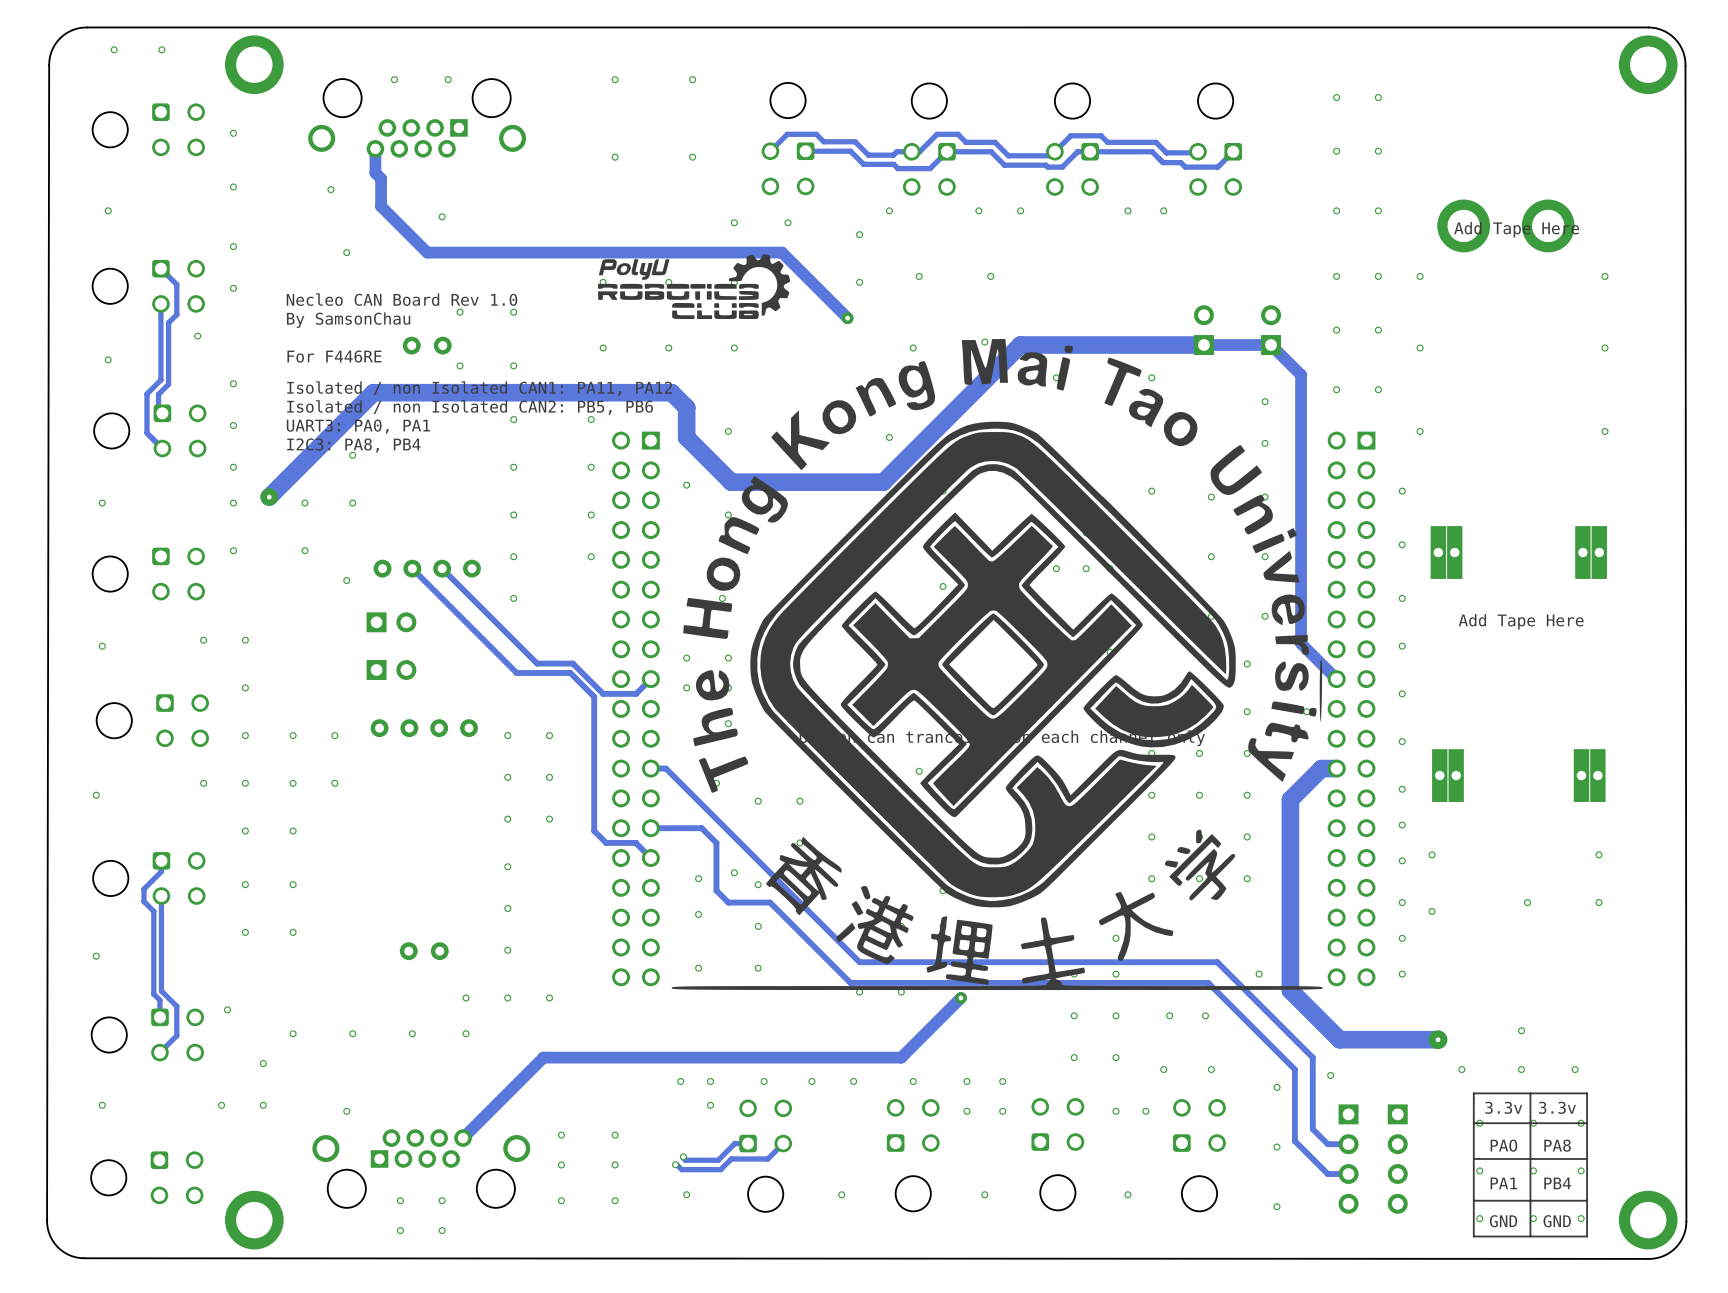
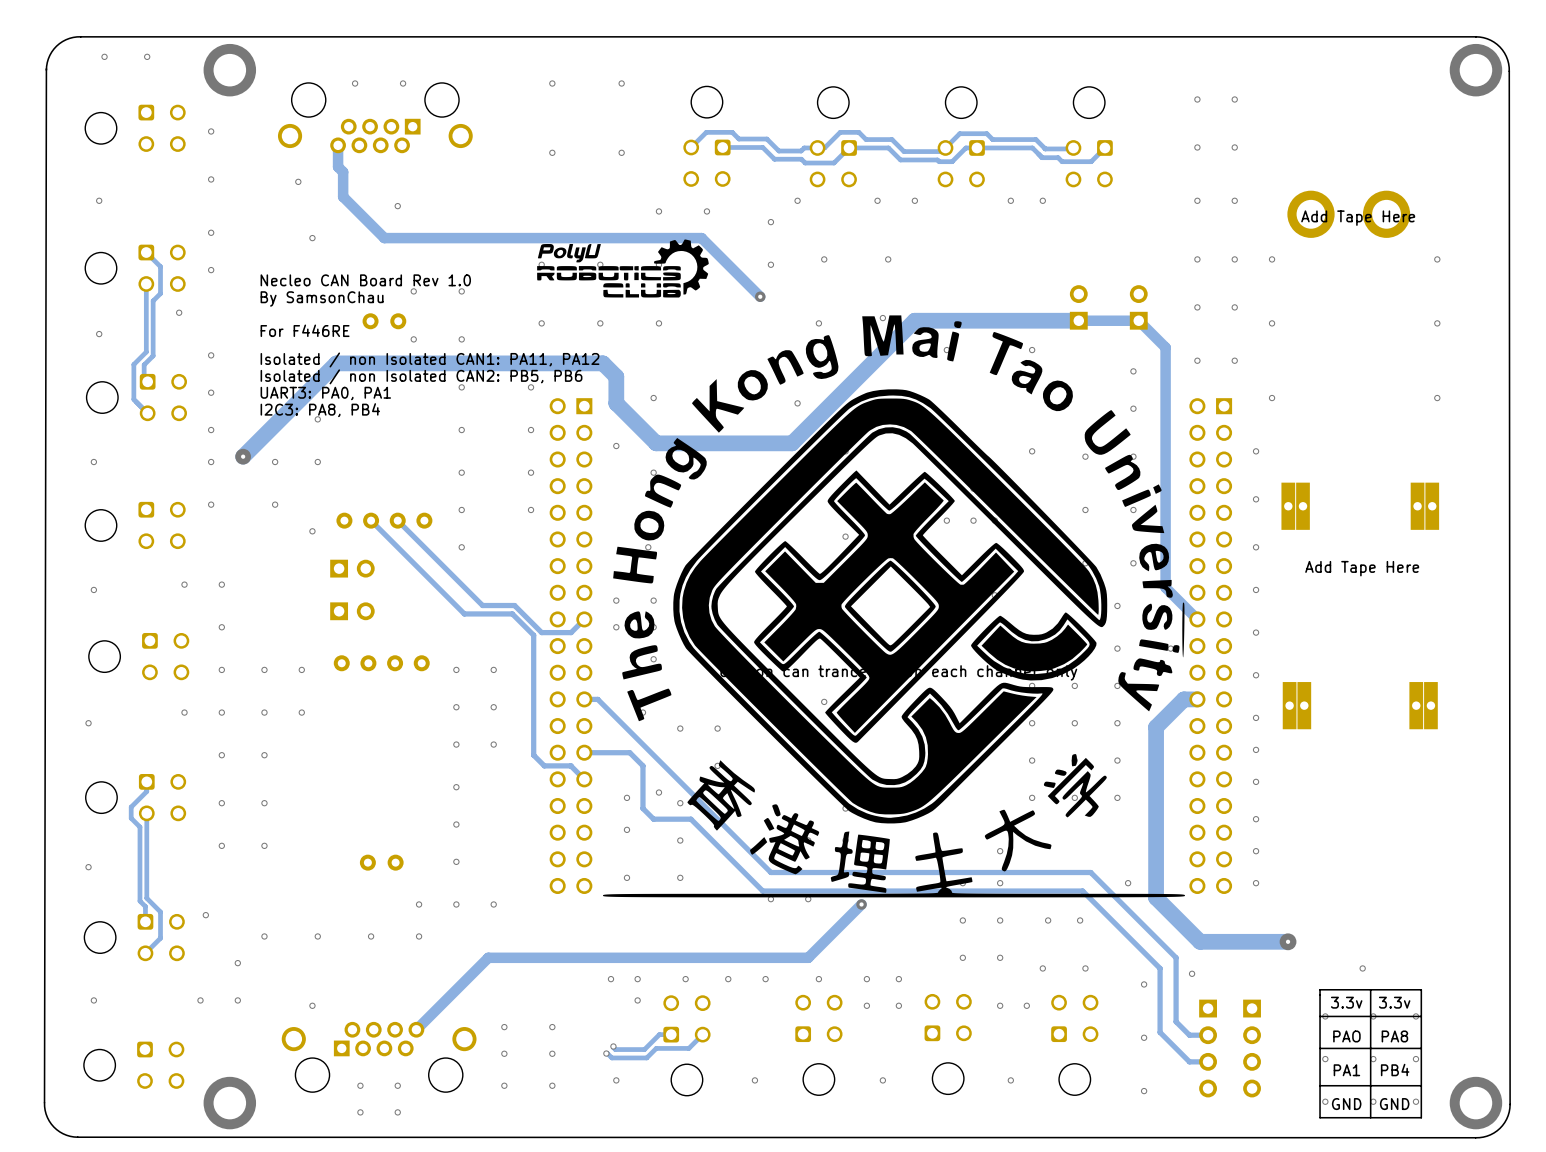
via: (1432, 854) -> none
via: (1599, 854) -> none
via: (1527, 902) -> none
via: (1599, 902) -> none
via: (1432, 911) -> none
via: (1521, 1030) -> none
via: (1461, 1069) -> none
via: (1575, 1069) -> none

